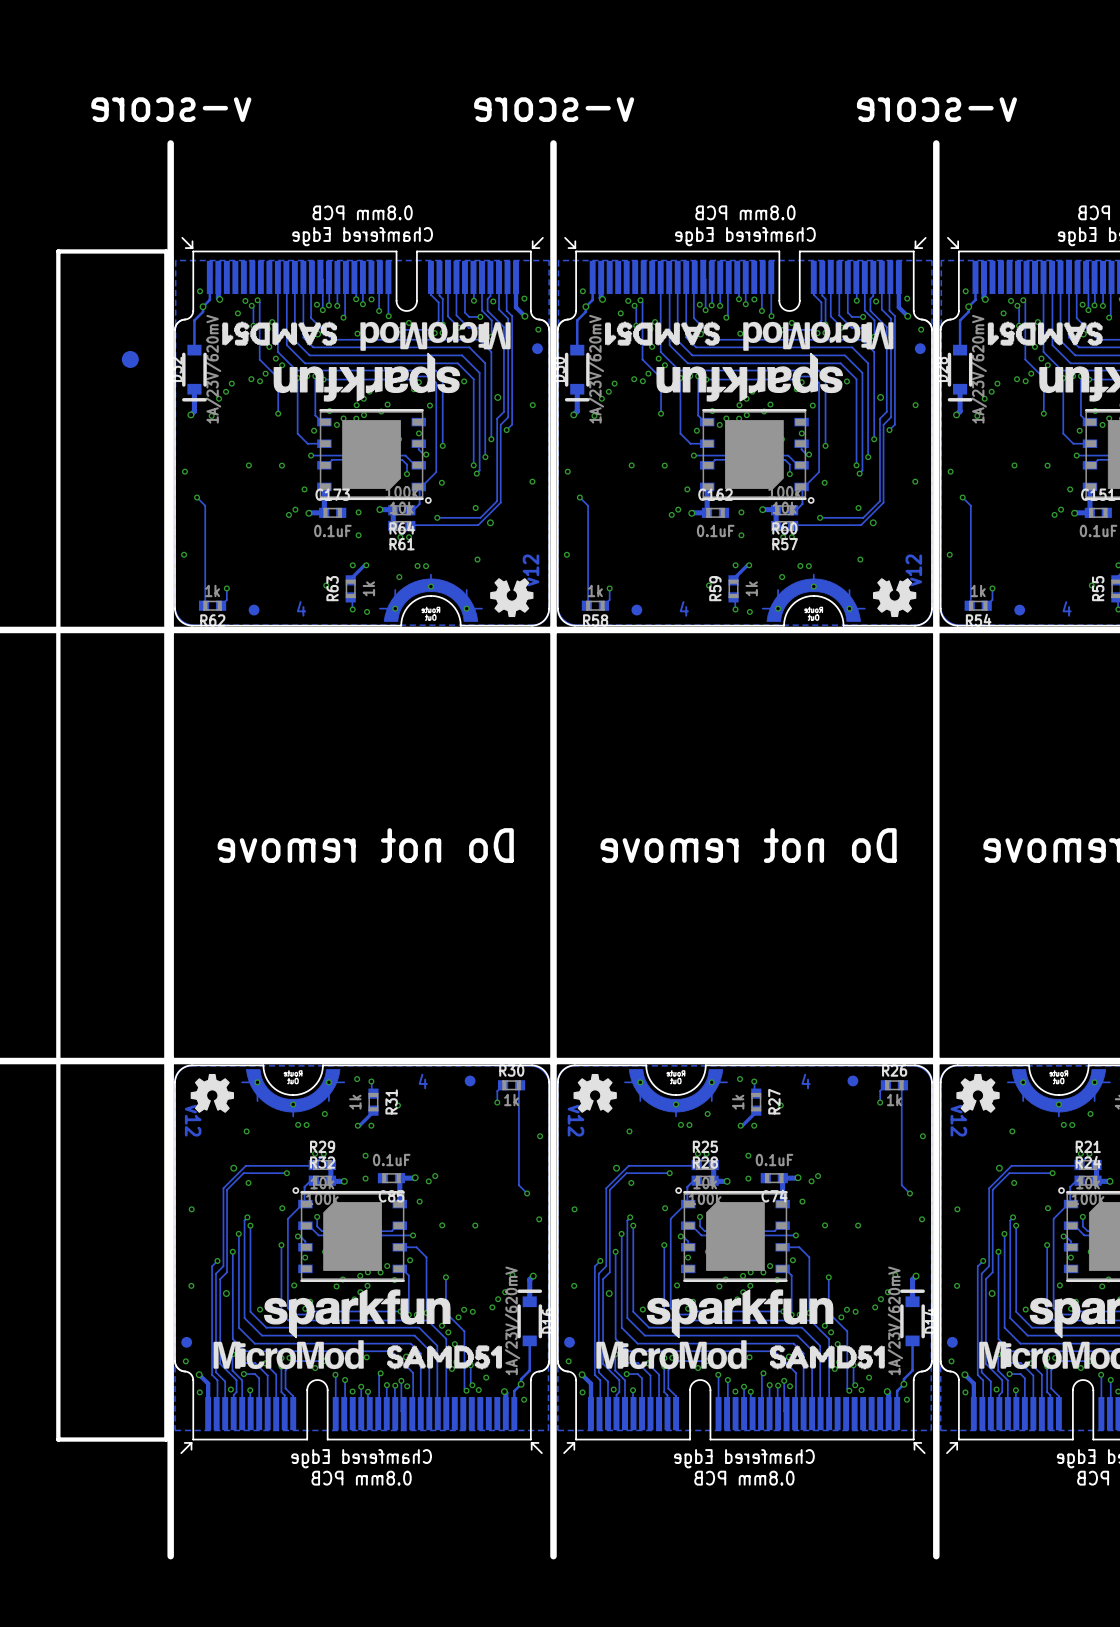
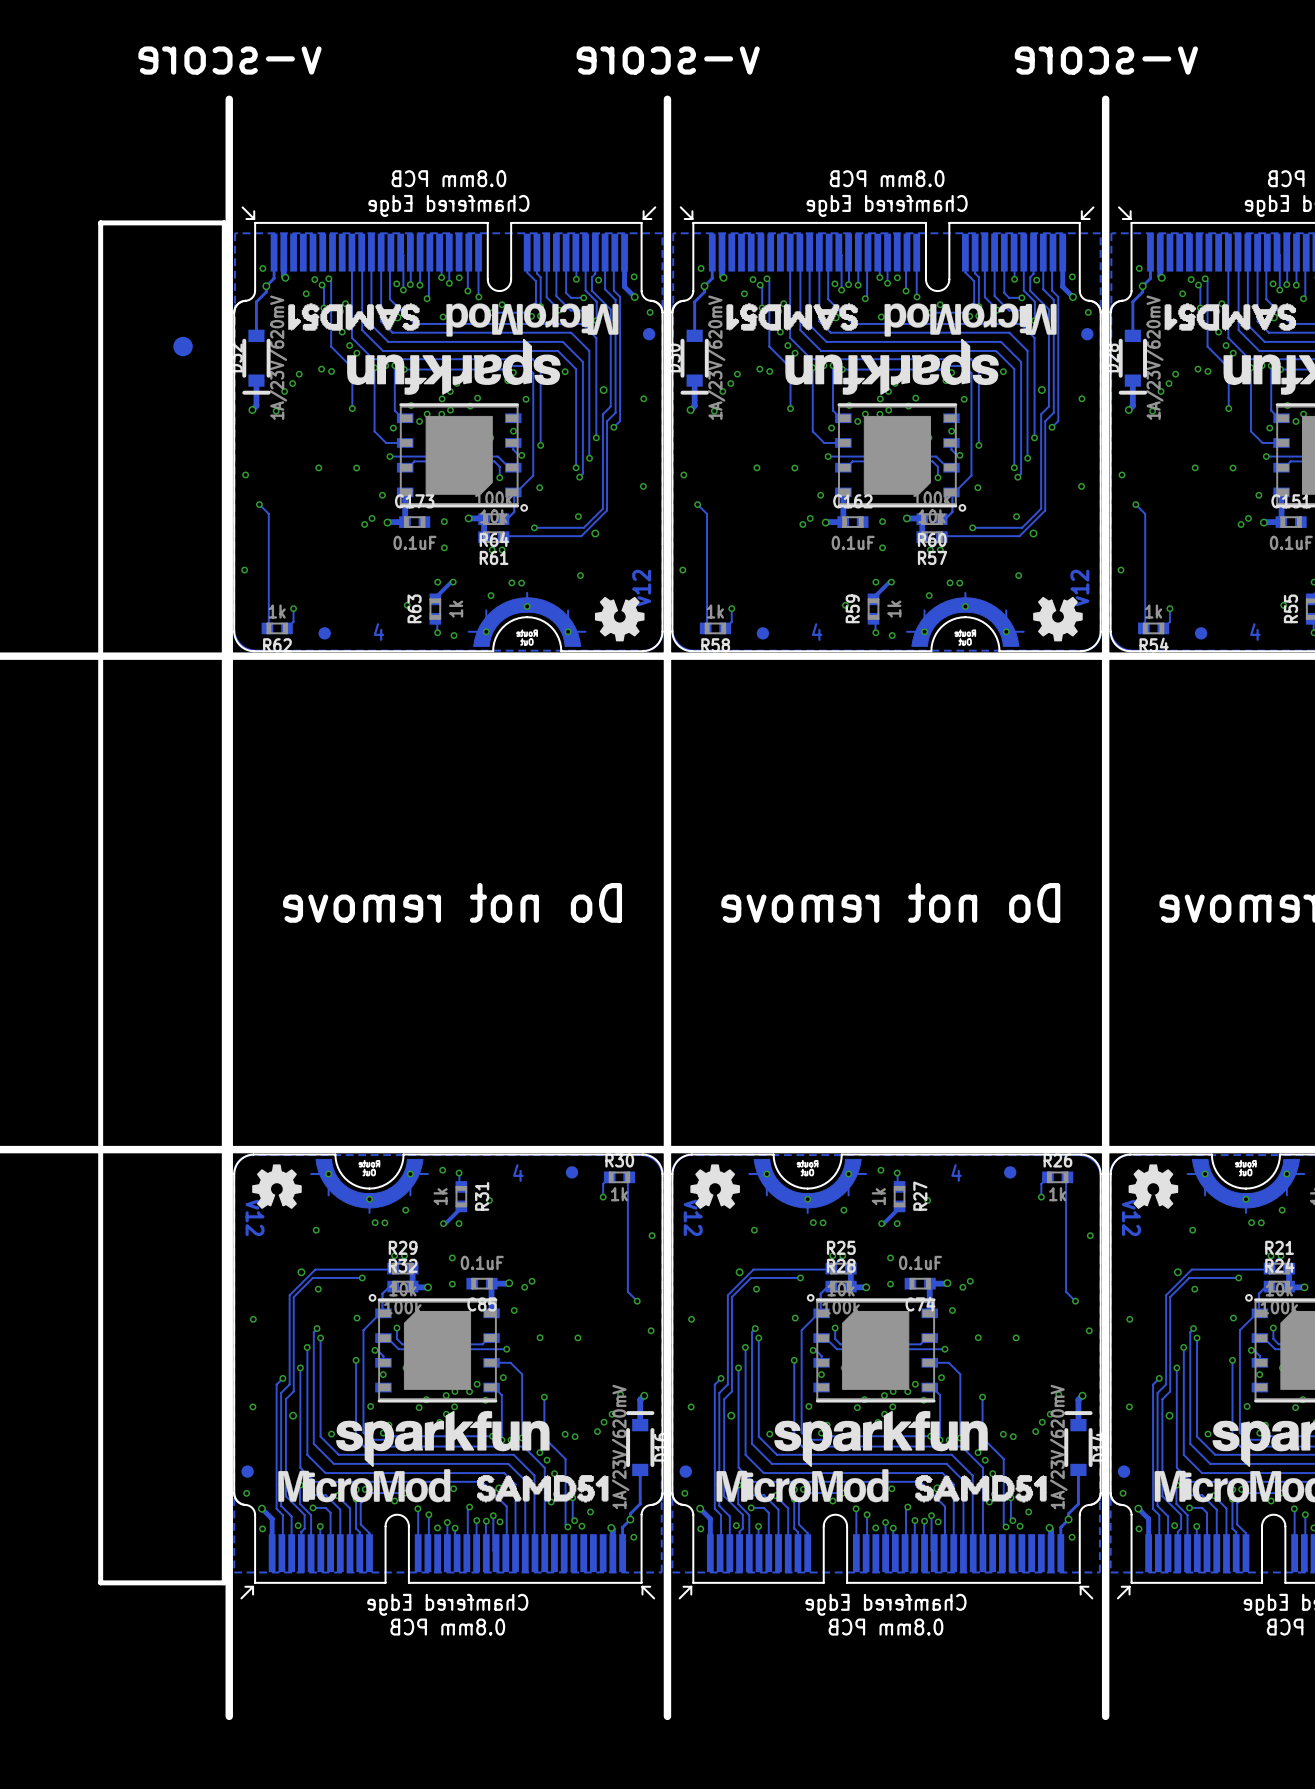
via: (265, 373) -> none
via: (648, 373) -> none
via: (1031, 373) -> none
via: (458, 1317) -> none
via: (841, 1317) -> none

